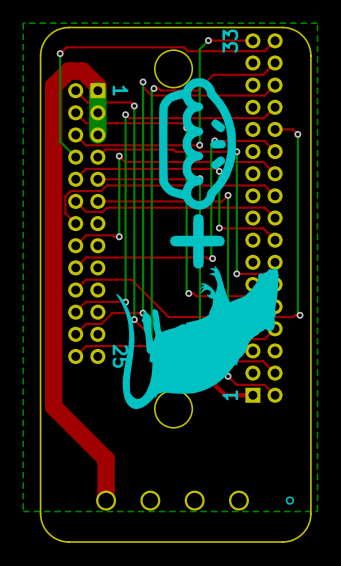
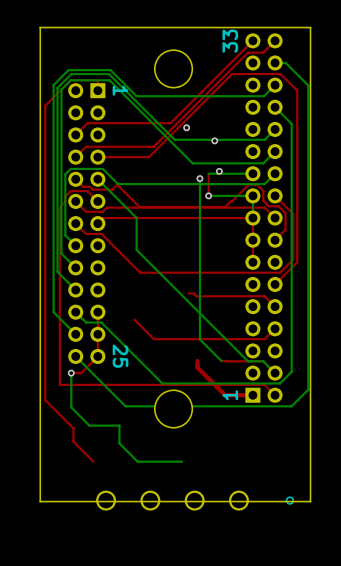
bottom zone outline: (317, 23) (317, 511) (23, 511) (23, 23) (317, 23) -> none
board edge: (282, 27) (65, 27) (51, 33) (42, 44) (40, 55) (40, 513) (46, 530) (58, 539) (68, 542) (282, 542) (299, 536) (308, 524) (310, 513) (310, 55) (308, 44) (302, 35) (293, 29) (282, 27) -> (310, 27) (310, 501) (40, 501) (40, 27) (310, 27)
top track: (208, 40) (252, 40) -> none
bottom track: (208, 40) (199, 49) (199, 145) -> none
via: (208, 40) -> none
top track: (264, 51) (187, 51) (183, 47) (66, 47) (60, 53) -> (264, 51) (247, 52) (153, 146) (86, 146) (75, 157)
bottom track: (60, 53) (60, 141) (75, 157) -> none
via: (60, 53) -> none
top track: (275, 62) (263, 74) (213, 74) (197, 90) (160, 90) (153, 88) -> none
bottom track: none -> (275, 62) (285, 62) (308, 85) (308, 389) (291, 406) (125, 406) (75, 356)
drawing: [116, 78, 280, 410] -> none
top track: (143, 81) (143, 86) (151, 95) (264, 95) (275, 85) -> none
bottom track: (143, 81) (143, 313) -> none
via: (143, 81) -> none
bottom track: none -> (275, 85) (263, 96) (136, 96) (110, 70) (68, 70) (53, 85) (53, 312) (75, 334)
top track: (97, 86) (82, 71) (68, 71) (53, 86) (53, 406) (106, 459) (106, 500) -> (97, 86) (97, 80) (70, 80) (45, 105) (45, 400) (73, 428) (73, 441) (93, 461)
bottom track: (153, 88) (151, 90) (151, 345) -> none
via: (153, 88) -> none
top track: (75, 90) (87, 102) (130, 102) (134, 105) -> none
bottom track: (97, 90) (97, 134) -> none
bottom track: (134, 105) (134, 319) -> none
via: (134, 105) -> none
top track: (275, 107) (264, 118) (129, 118) (125, 114) -> none
bottom track: none -> (275, 107) (291, 123) (291, 371) (280, 383) (162, 383) (101, 322) (86, 322) (75, 312)
top track: (75, 112) (87, 123) -> (75, 134) (87, 123)
bottom track: (125, 114) (125, 302) -> none
via: (125, 114) -> none
top track: (170, 123) (182, 123) (186, 127) -> (170, 123) (251, 42)
bottom track: (186, 127) (186, 291) (188, 293) -> none
top track: (275, 129) (292, 129) (297, 134) -> none
bottom track: none -> (275, 129) (264, 139) (174, 139) (108, 74) (71, 74) (57, 87) (57, 271) (75, 290)
top track: (75, 134) (86, 145) (199, 145) -> none
bottom track: (297, 134) (297, 313) (300, 315) -> none
via: (297, 134) -> none
top track: (214, 140) (264, 140) (275, 151) -> none
bottom track: (214, 140) (211, 144) (212, 258) -> none
via: (199, 145) -> none
top track: (236, 151) (105, 149) (97, 157) -> (275, 284) (297, 262) (297, 90) (280, 74) (232, 74) (148, 157) (97, 157)
bottom track: (236, 151) (236, 273) -> none
via: (236, 151) -> none
bottom track: none -> (275, 151) (263, 163) (192, 163) (109, 80) (70, 80) (61, 89) (61, 253) (75, 267)
top track: (119, 156) (125, 161) (263, 161) (275, 173) -> none
bottom track: (119, 156) (119, 236) -> none
via: (119, 156) -> none
top track: (219, 171) (216, 168) (86, 168) (75, 179) -> (257, 184) (248, 184) (225, 206) (139, 206) (117, 184) (112, 189) (92, 189) (90, 186) (83, 186) (75, 179)
bottom track: (219, 171) (219, 228) -> none
top track: none -> (208, 173) (208, 195)
bottom track: none -> (252, 173) (208, 173)
bottom track: none -> (275, 173) (264, 184) (118, 184) (102, 168) (70, 168) (65, 174) (65, 235) (75, 245)
top track: (199, 178) (97, 179) -> none
bottom track: none -> (97, 179) (136, 218) (136, 249) (247, 361) (263, 361) (275, 373)
top track: (87, 191) (101, 191) (106, 185) (264, 185) (275, 195) -> (75, 223) (86, 233) (101, 233) (140, 272) (280, 272) (293, 259) (293, 214) (275, 195)
bottom track: none -> (208, 195) (252, 195) (252, 218)
via: none -> (208, 195)
top track: (228, 195) (222, 201) (97, 201) -> (87, 191) (97, 201)
bottom track: (228, 195) (228, 376) -> none
via: (228, 195) -> none
top track: (65, 201) (65, 213) (75, 223) -> (65, 201) (59, 207) (59, 384) (236, 384)
top track: none -> (97, 223) (103, 218) (252, 218) (252, 262)
top track: (219, 228) (263, 228) (275, 240) -> (256, 184) (263, 190) (263, 200) (268, 206) (278, 206) (285, 213) (285, 229) (275, 240)
via: (219, 228) -> none
top track: (119, 236) (86, 235) (75, 245) -> none
via: (119, 236) -> none
top track: (212, 258) (86, 257) (75, 267) -> none
via: (212, 258) -> none
top track: (236, 273) (264, 273) (275, 284) -> none
via: (236, 273) -> none
top track: (75, 290) (86, 279) (131, 279) (168, 317) (293, 317) (300, 315) -> none
via: (188, 293) -> none
top track: (125, 302) (86, 301) (75, 312) -> none
via: (125, 302) -> none
top track: none -> (97, 312) (97, 356) (81, 373) (71, 373)
top track: (143, 313) (112, 313) (101, 323) (86, 323) (75, 334) -> none
via: (143, 313) -> none
via: (300, 315) -> none
via: (134, 319) -> none
top track: (151, 345) (86, 346) (75, 356) -> none
bottom track: none -> (71, 373) (71, 407) (89, 425) (119, 425) (119, 443) (137, 461) (182, 461)
via: none -> (71, 373)
top track: (228, 376) (236, 384) -> none
via: (228, 376) -> none

